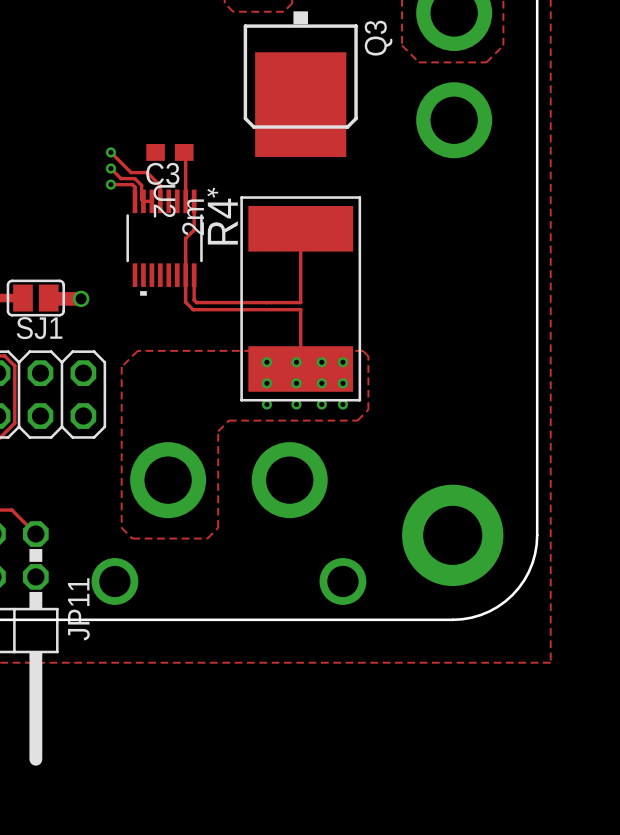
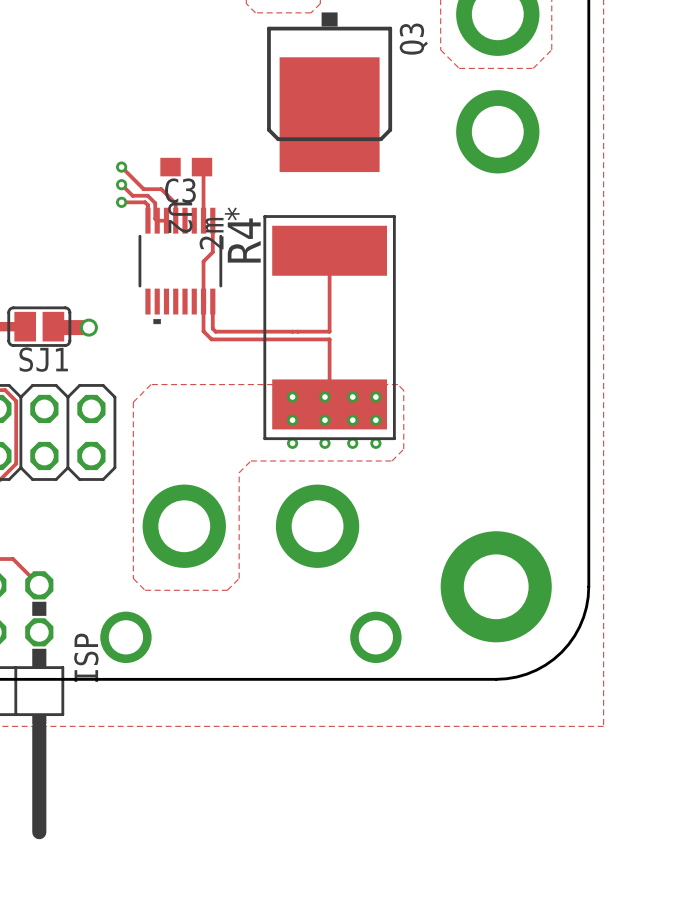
JP11 name: JP11 (78, 609) -> ISP (86, 657)

